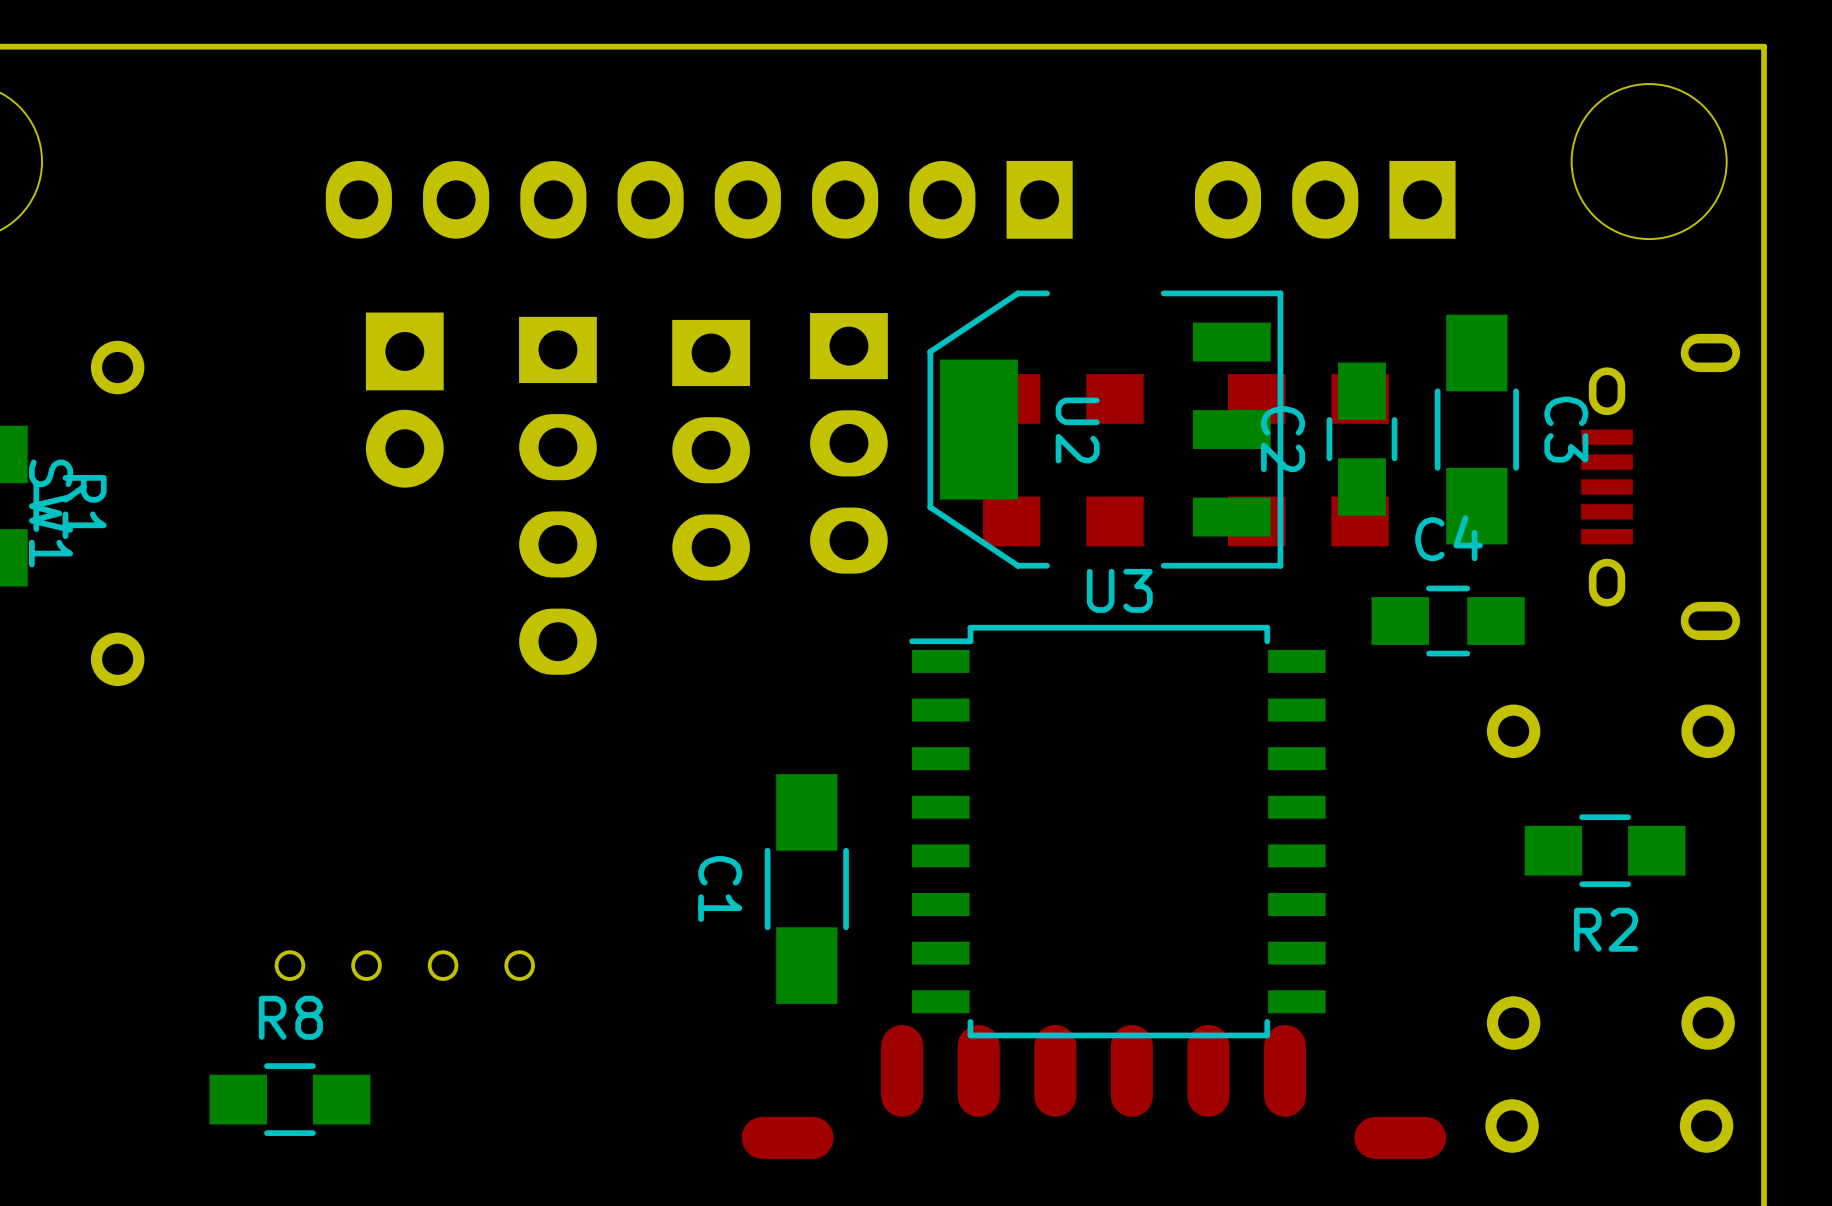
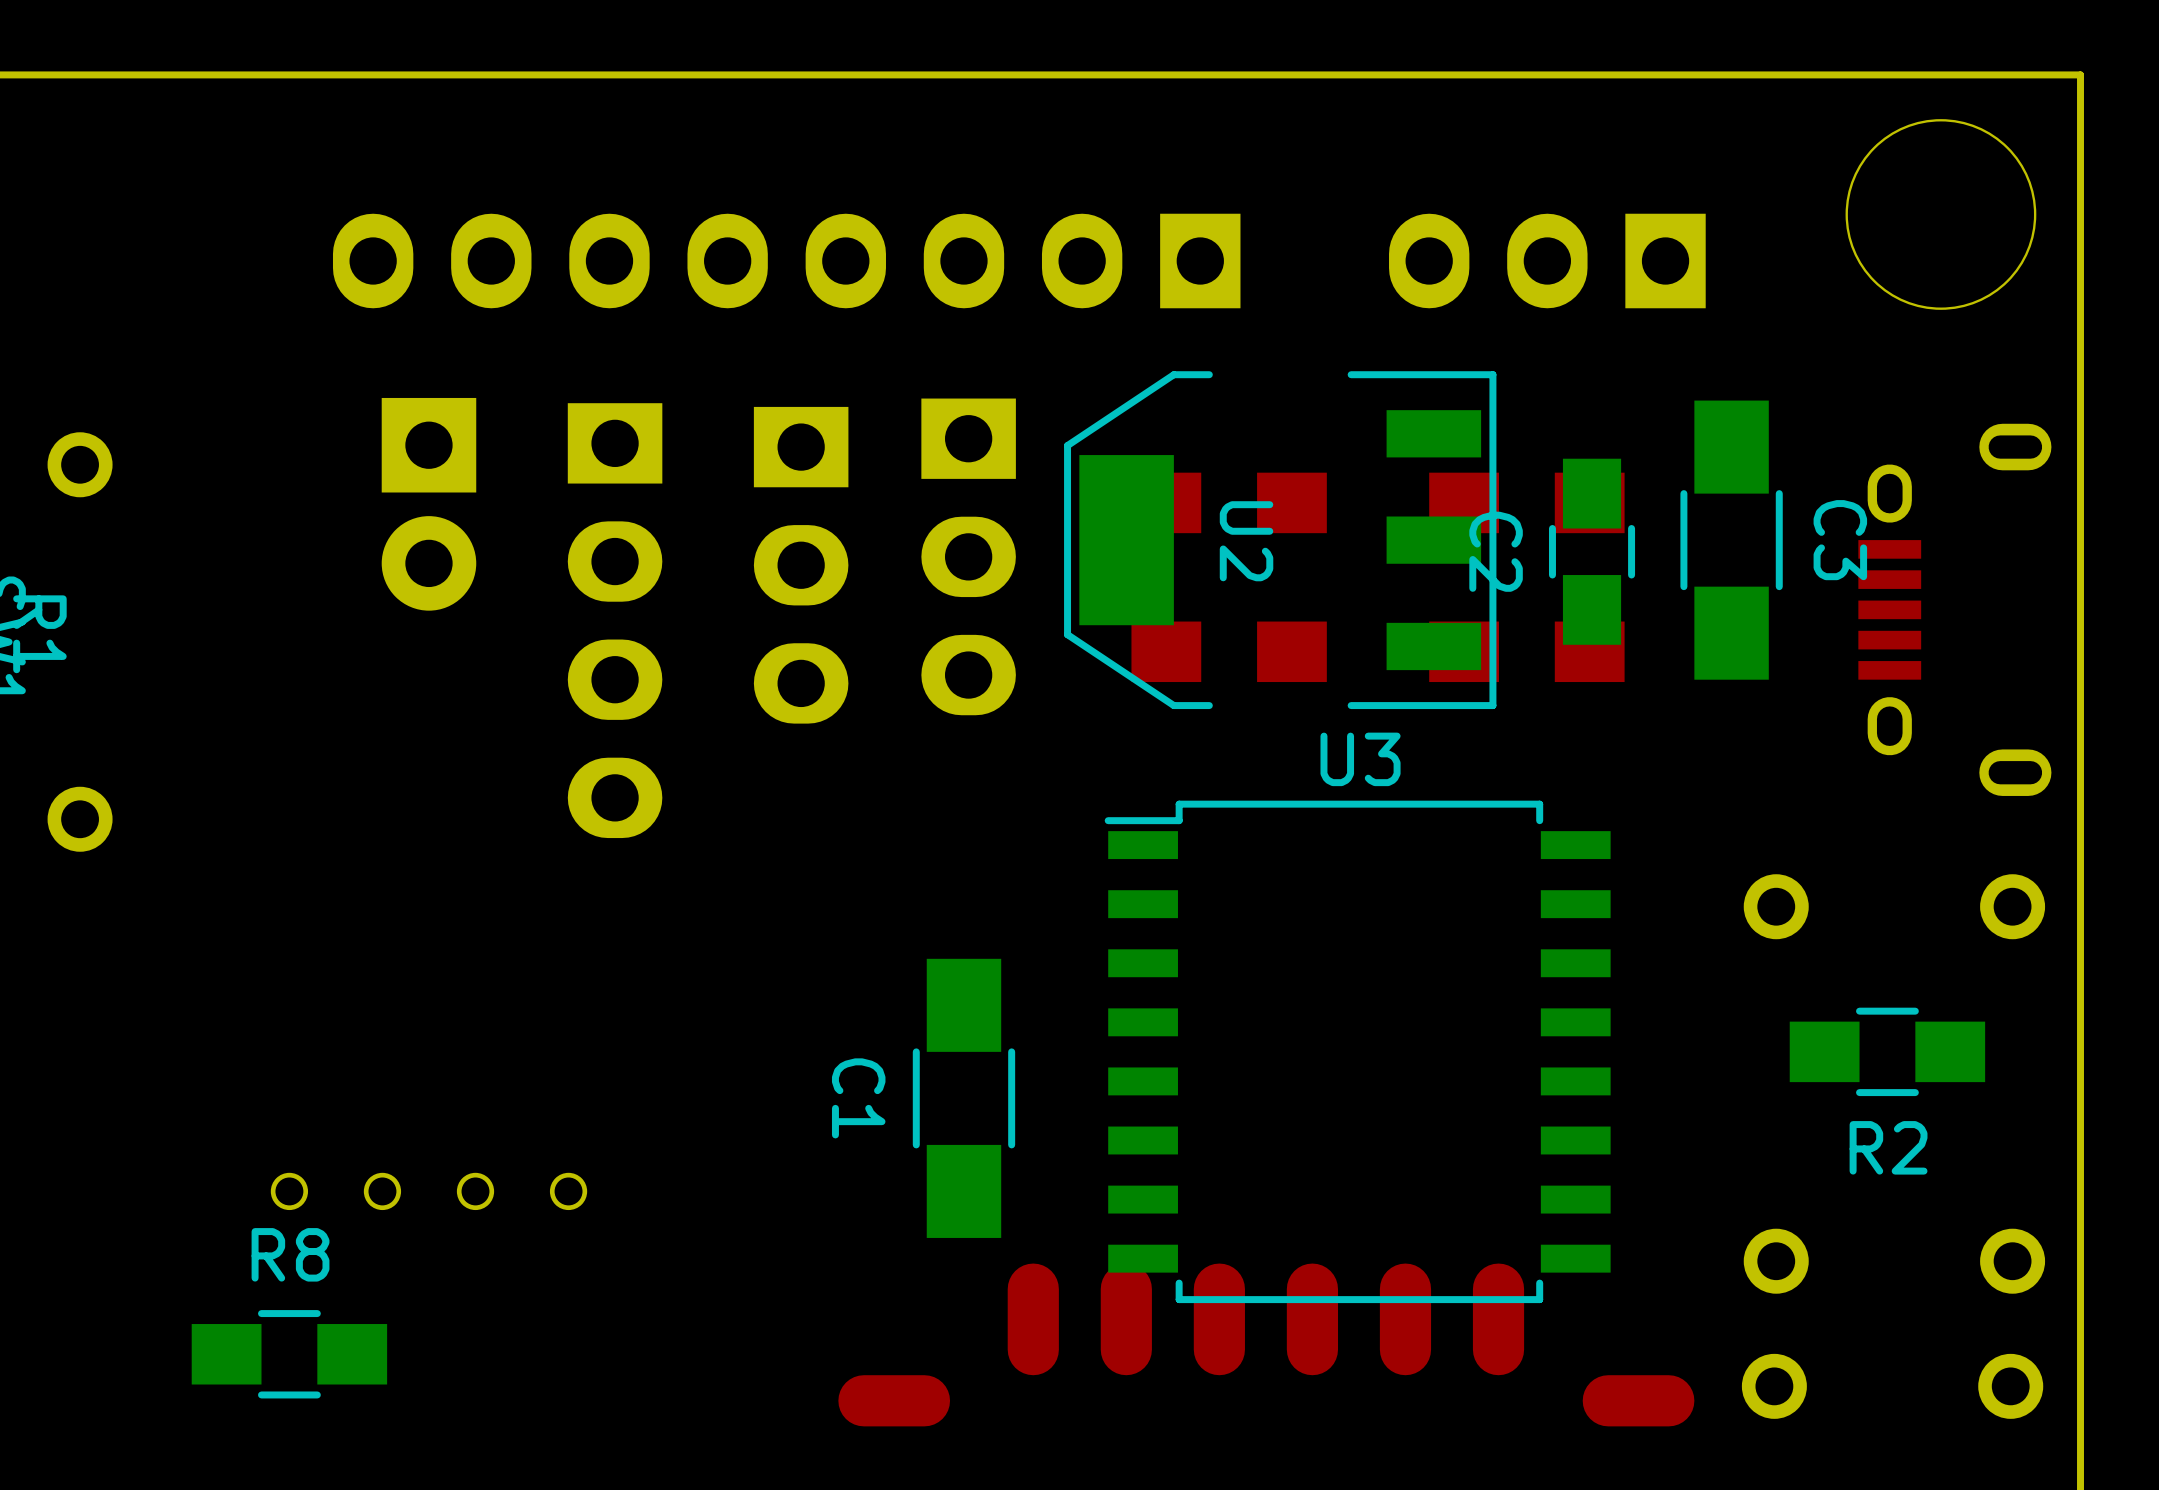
C4: (1448, 621) -> none
U3 position: (1117, 831) -> (1357, 1051)
C1 position: (806, 889) -> (963, 1098)

